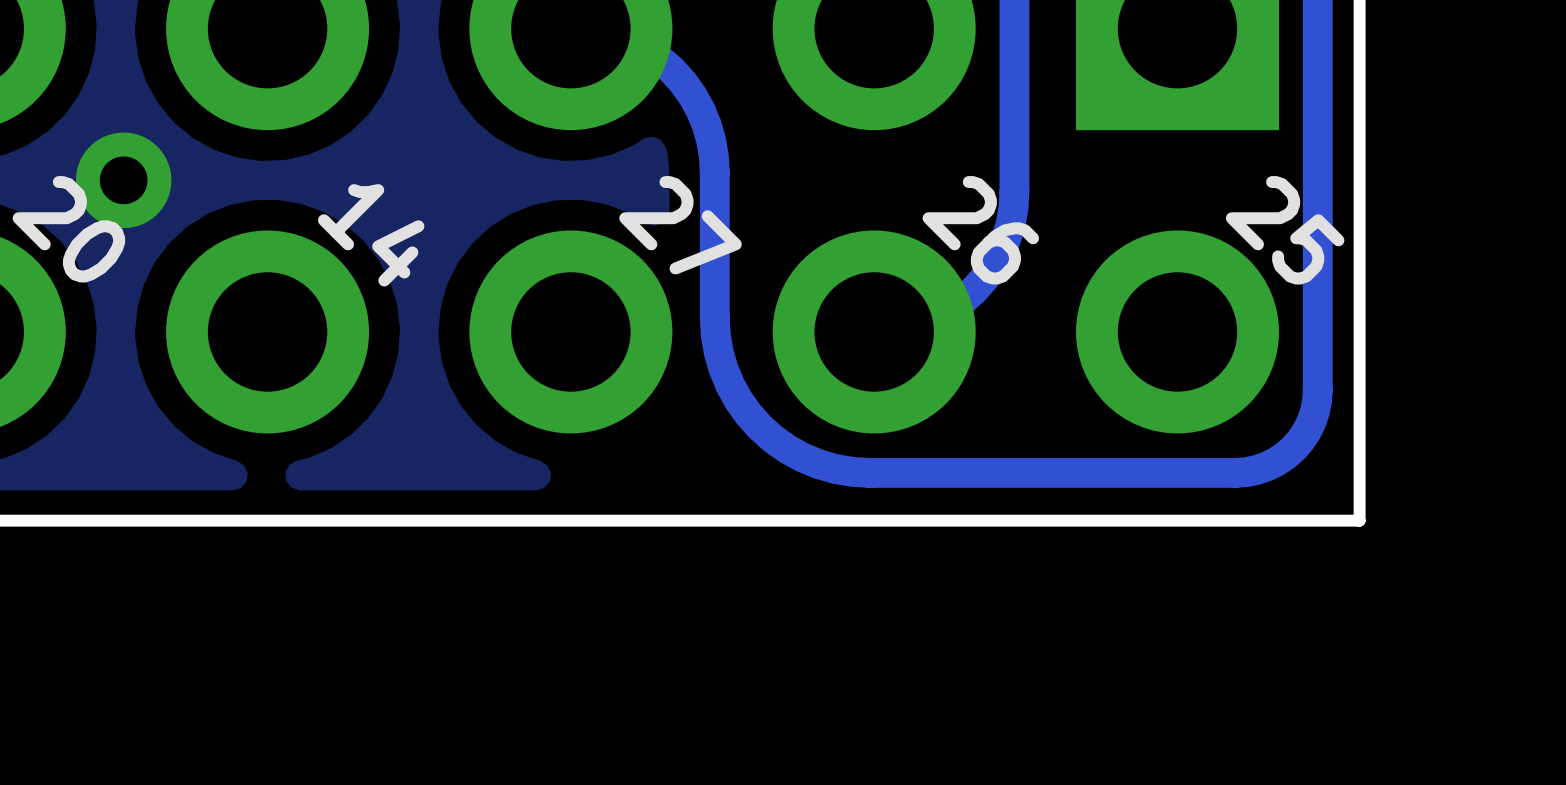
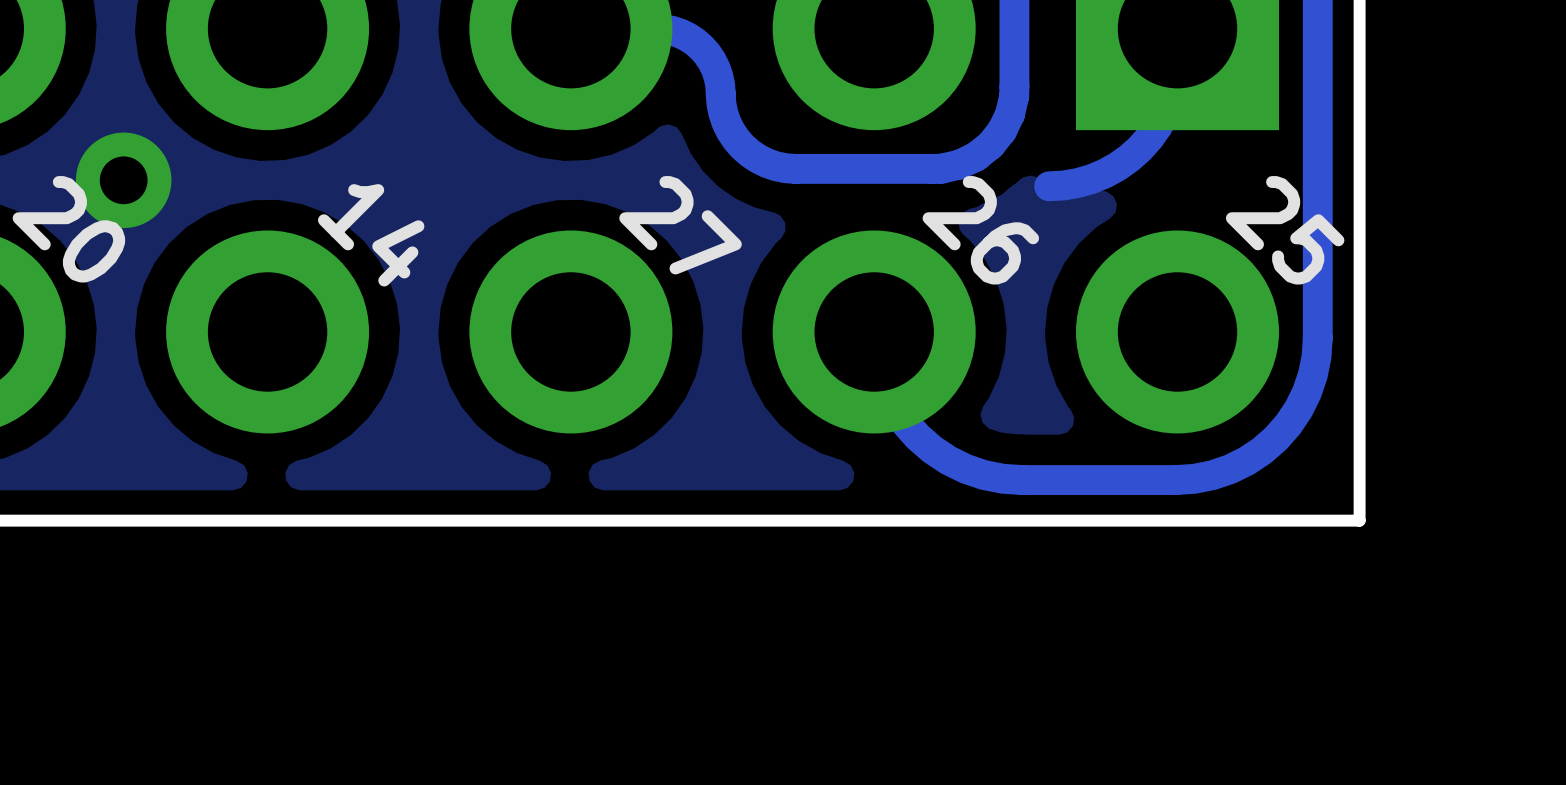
track: (570, 28) (602, 32) (633, 42) (660, 60) (672, 70) (692, 96) (706, 125) (713, 156) (714, 317) (718, 352) (723, 368) (738, 400) (760, 427) (787, 449) (818, 464) (852, 471) (870, 472) (1234, 472) (1256, 470) (1276, 461) (1293, 448) (1311, 421) (1317, 400) (1317, 338) -> (570, 28) (664, 29) (688, 37) (707, 54) (715, 68) (720, 85) (723, 113) (736, 139) (758, 158) (786, 168) (932, 168) (959, 164) (976, 156) (990, 145) (1002, 130) (1010, 114) (1014, 86)
track: none -> (1177, 28) (1177, 57) (1174, 86) (1164, 113) (1149, 137) (1129, 158) (1104, 173) (1077, 183) (1049, 186)
track: (1014, 86) (1013, 207) (1006, 238) (992, 266) (983, 279) (961, 301) (935, 318) (905, 328) (874, 331) -> (1317, 338) (1312, 374) (1298, 409) (1276, 438) (1262, 450) (1230, 469) (1212, 475) (1175, 480) (1022, 480) (983, 475) (965, 468) (932, 449) (917, 436) (904, 422) (885, 388) (879, 370) (874, 331)

